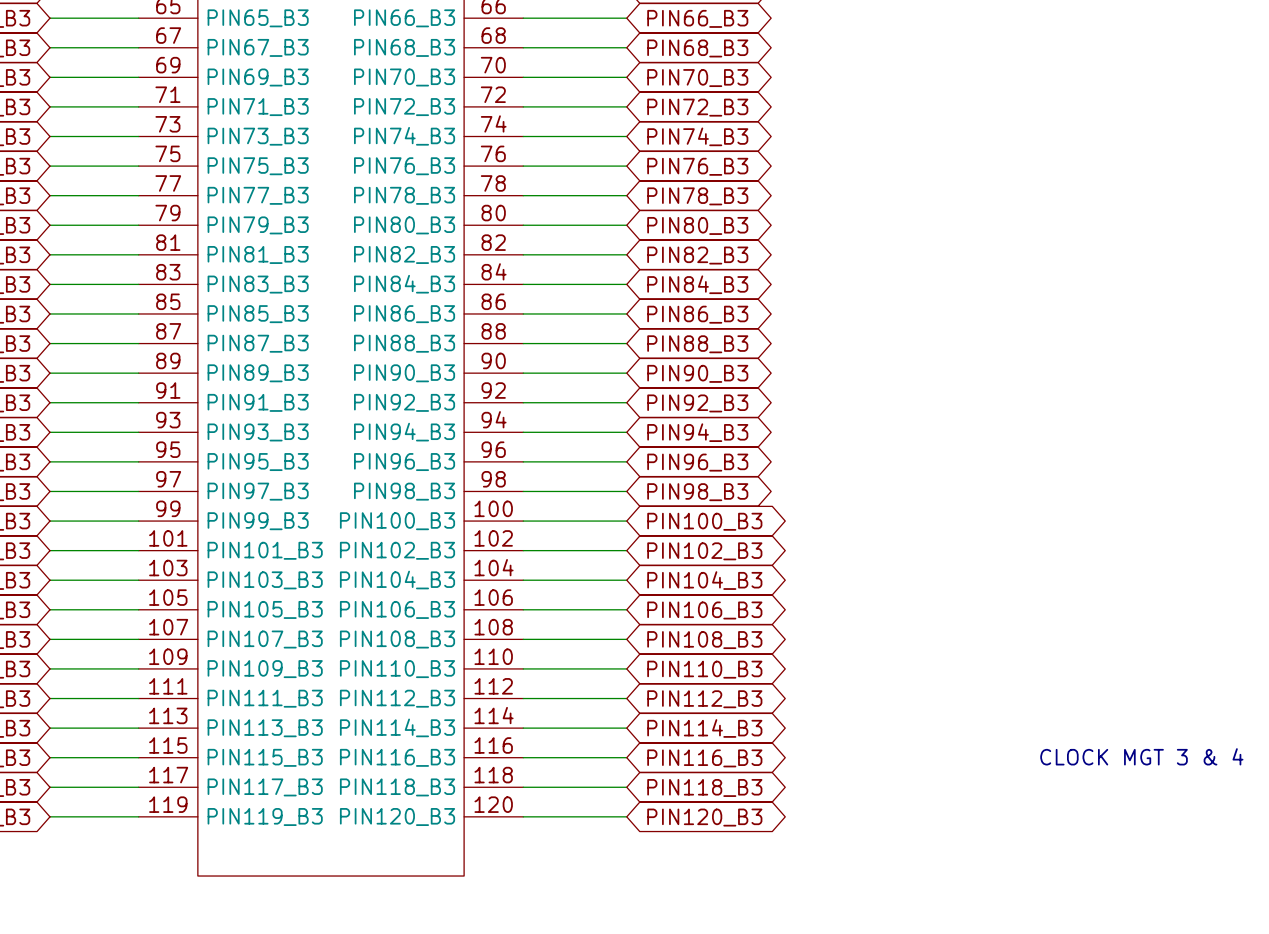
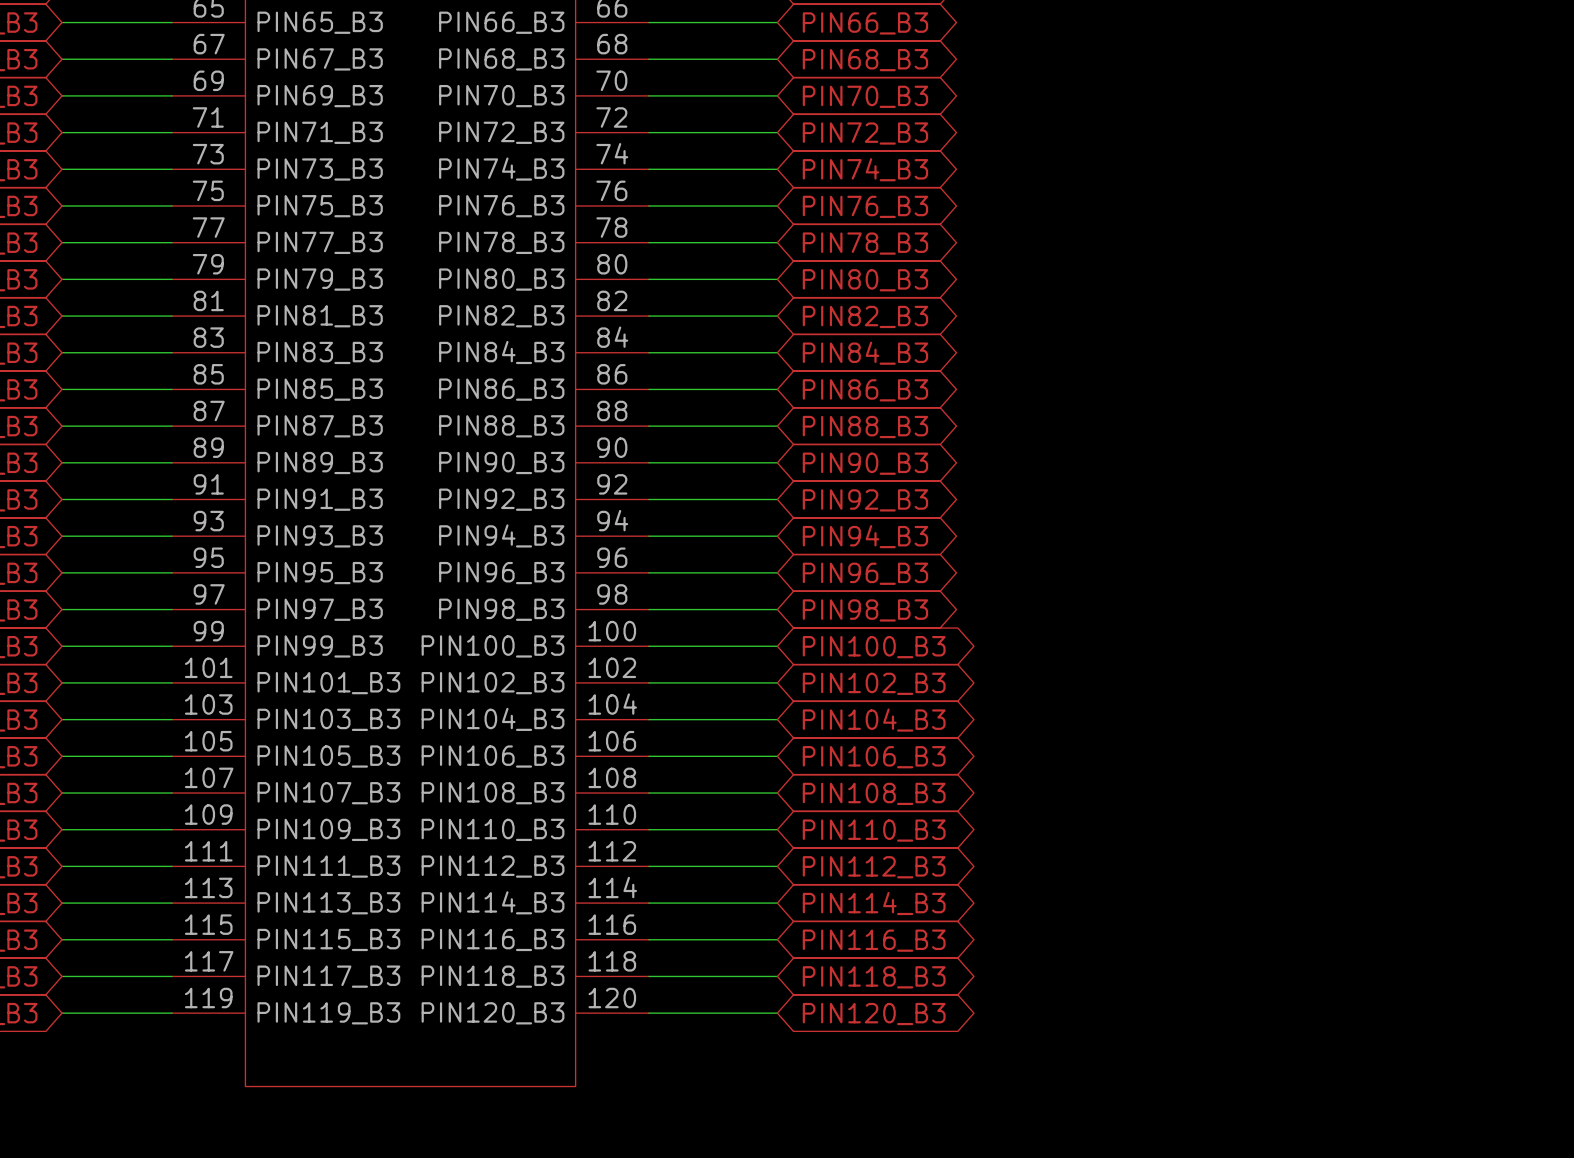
text: CLOCK MGT 3 & 4 (1141, 756) -> none

